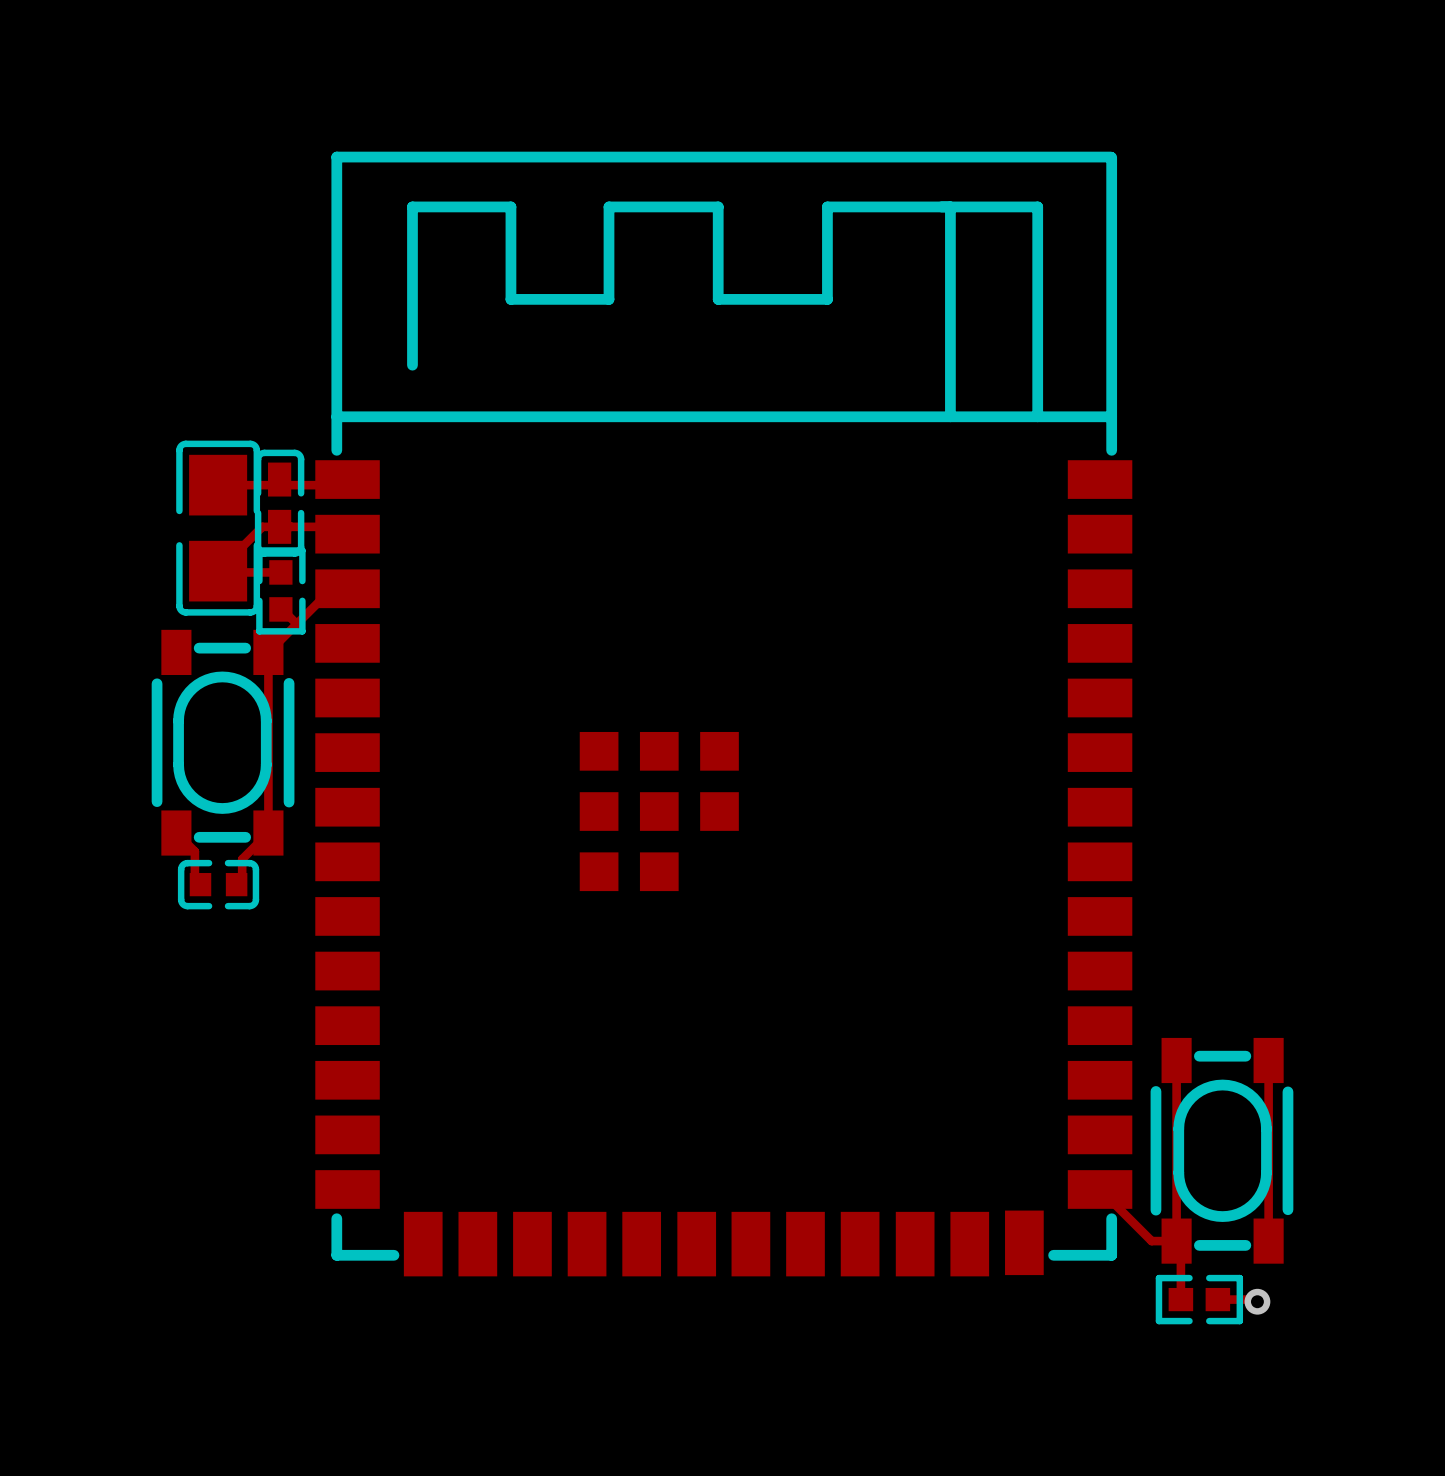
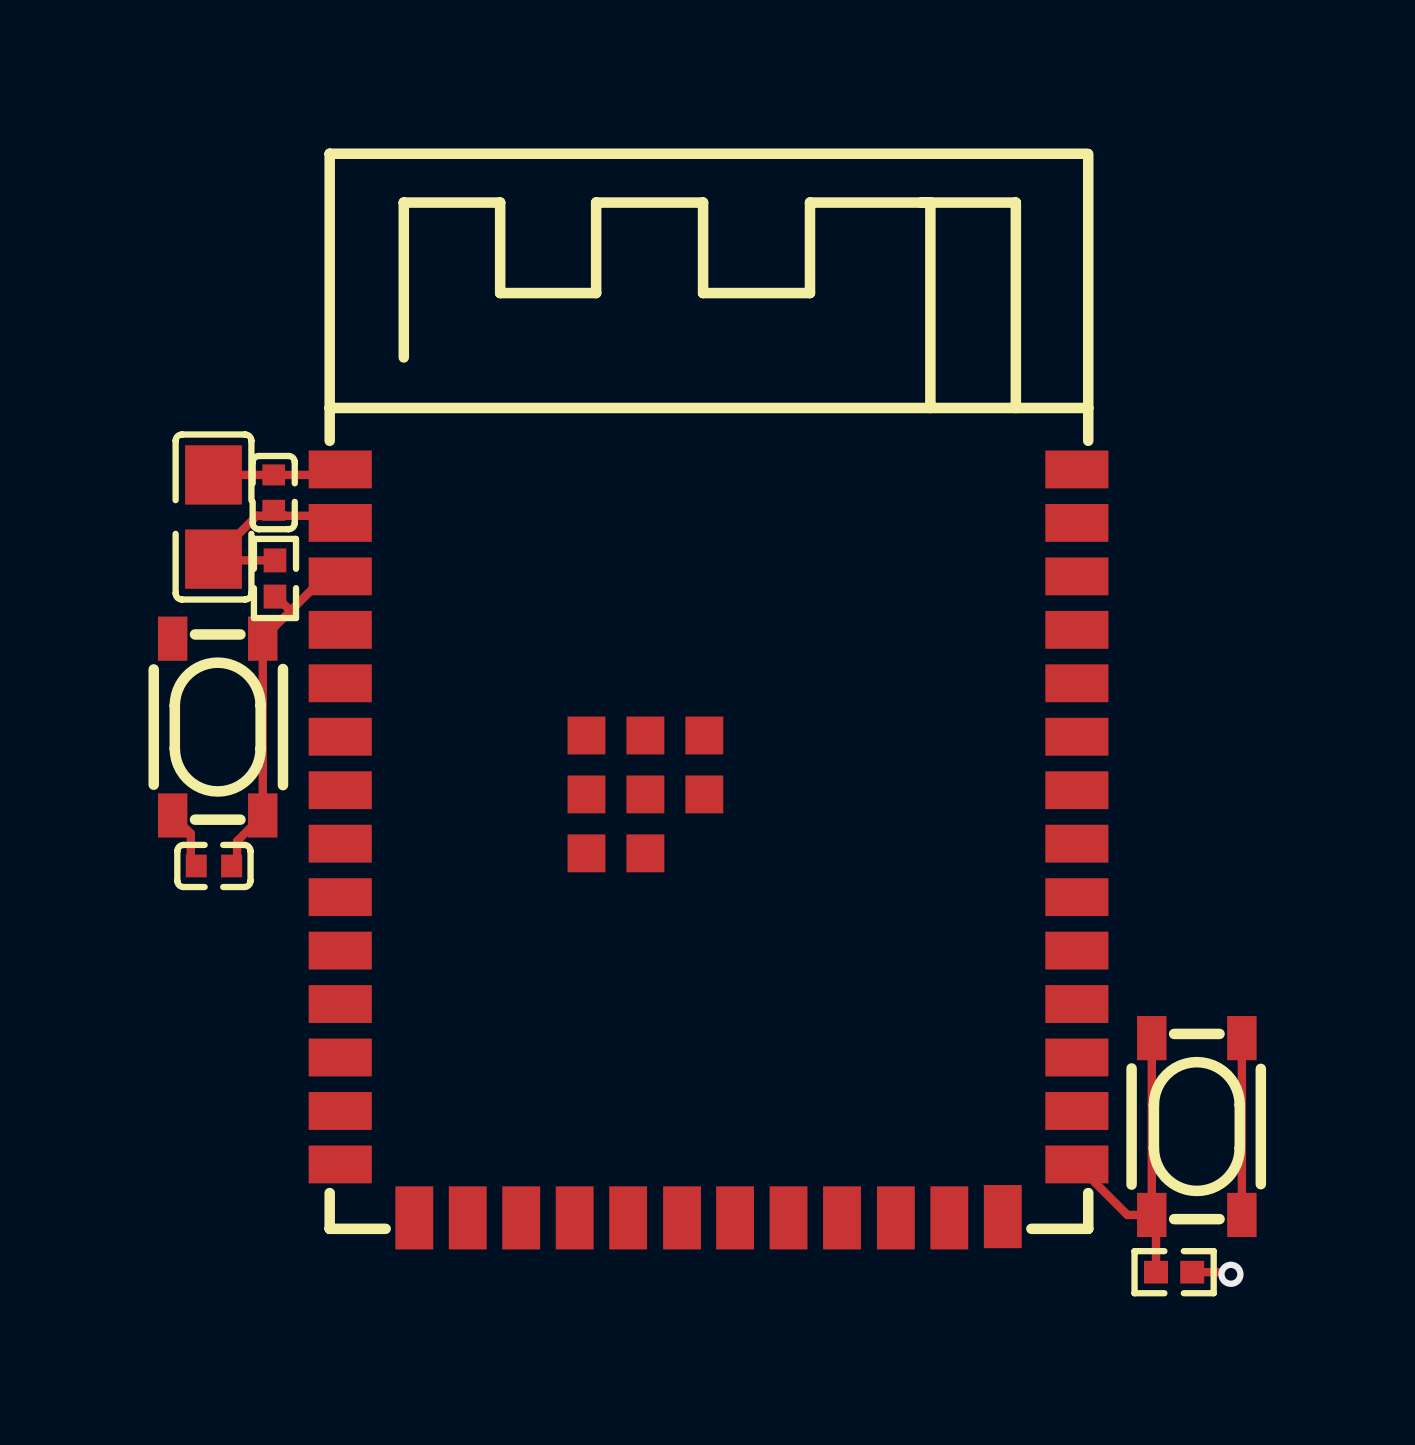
part footprint: [254, 449, 305, 557] -> [249, 452, 298, 533]

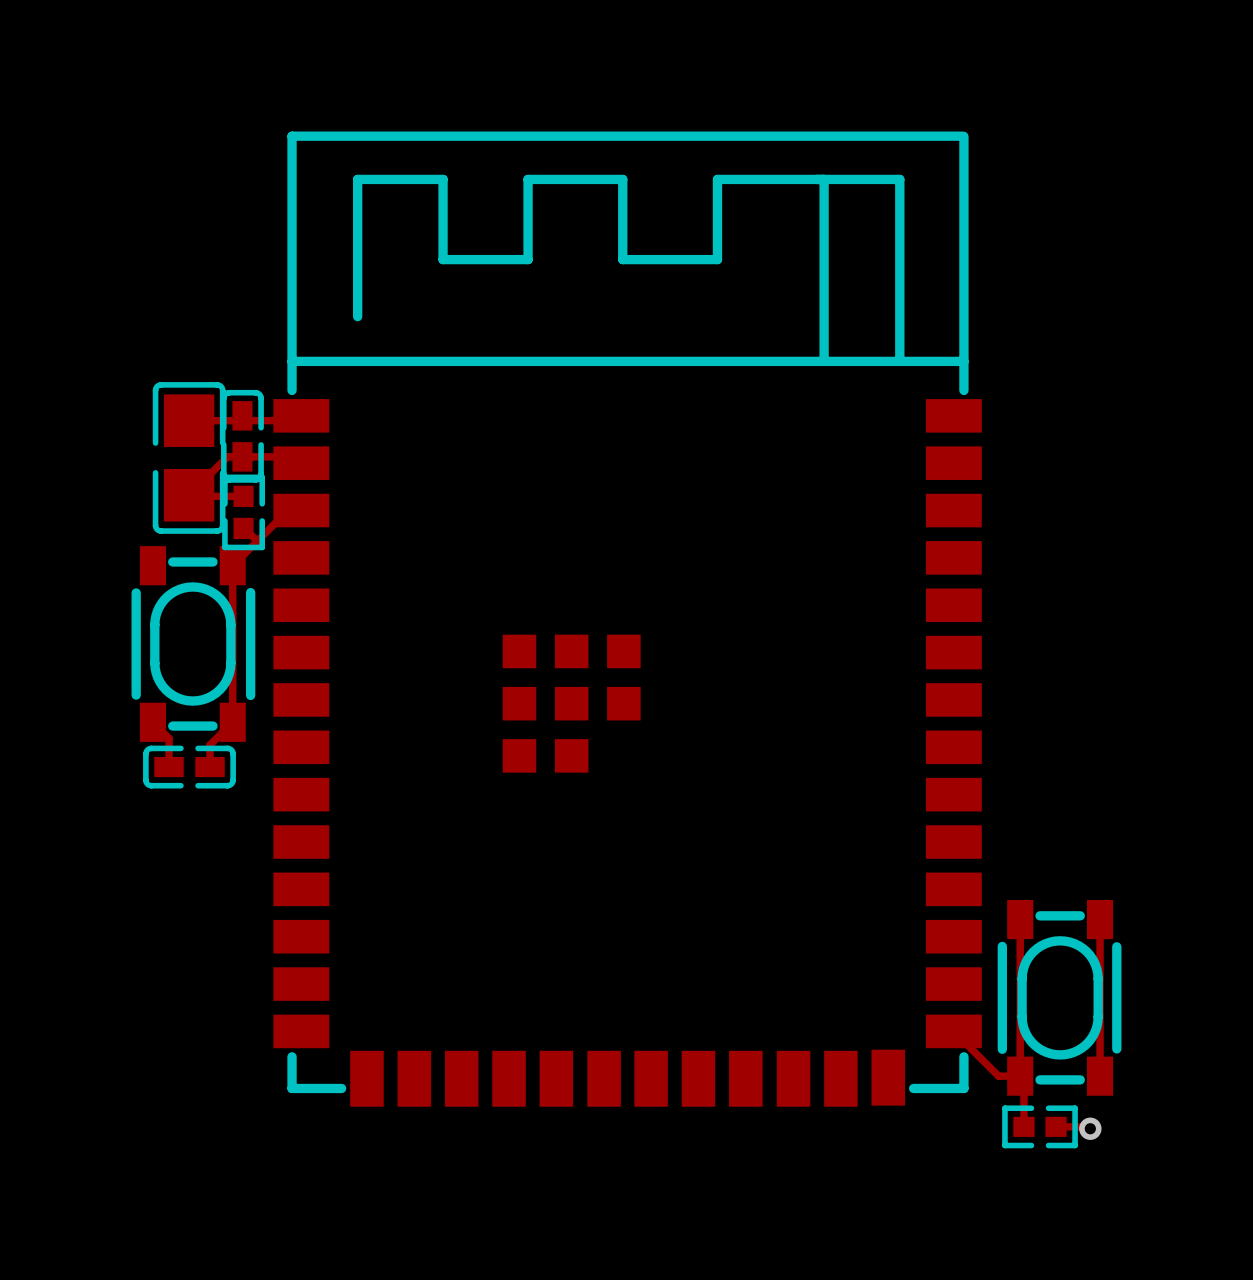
part footprint: [249, 452, 298, 533] -> [221, 389, 264, 483]
part footprint: [174, 841, 254, 891] -> [143, 745, 236, 789]

